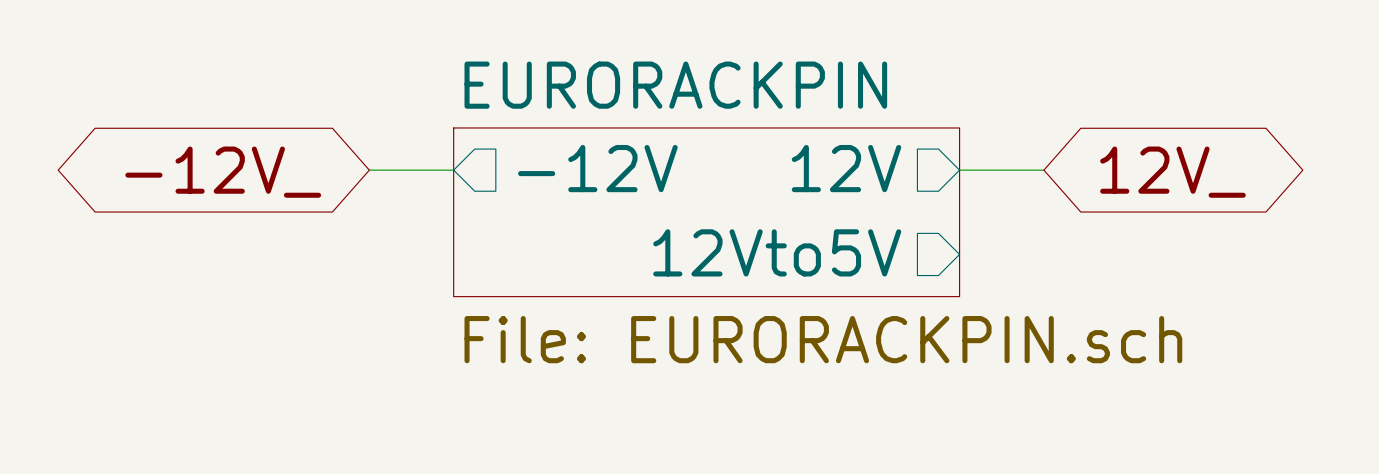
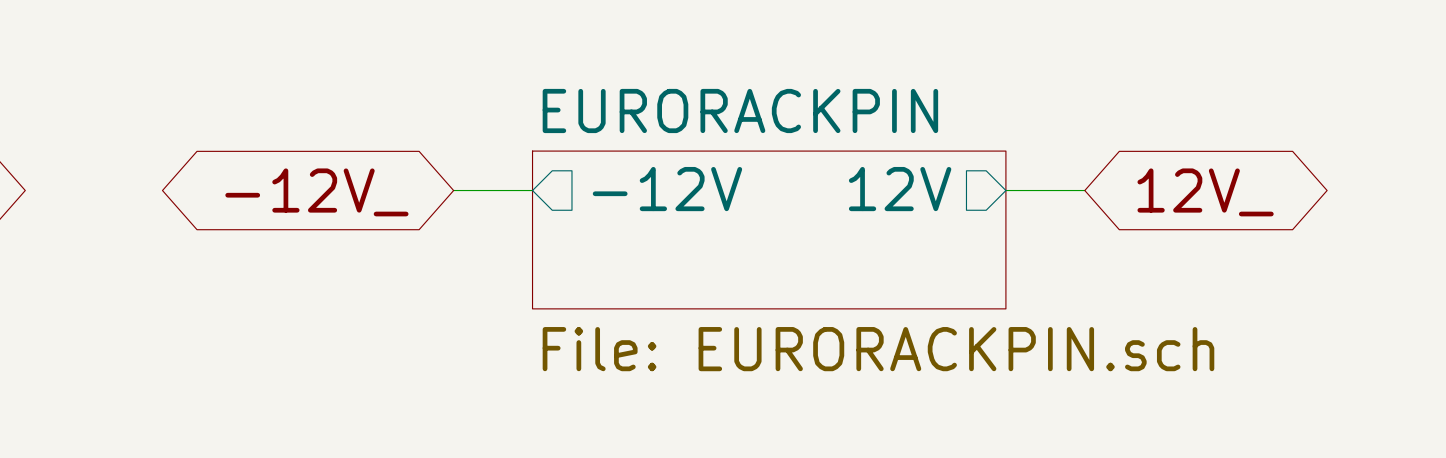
sheet pin: 12Vto5V (777, 252) -> none

